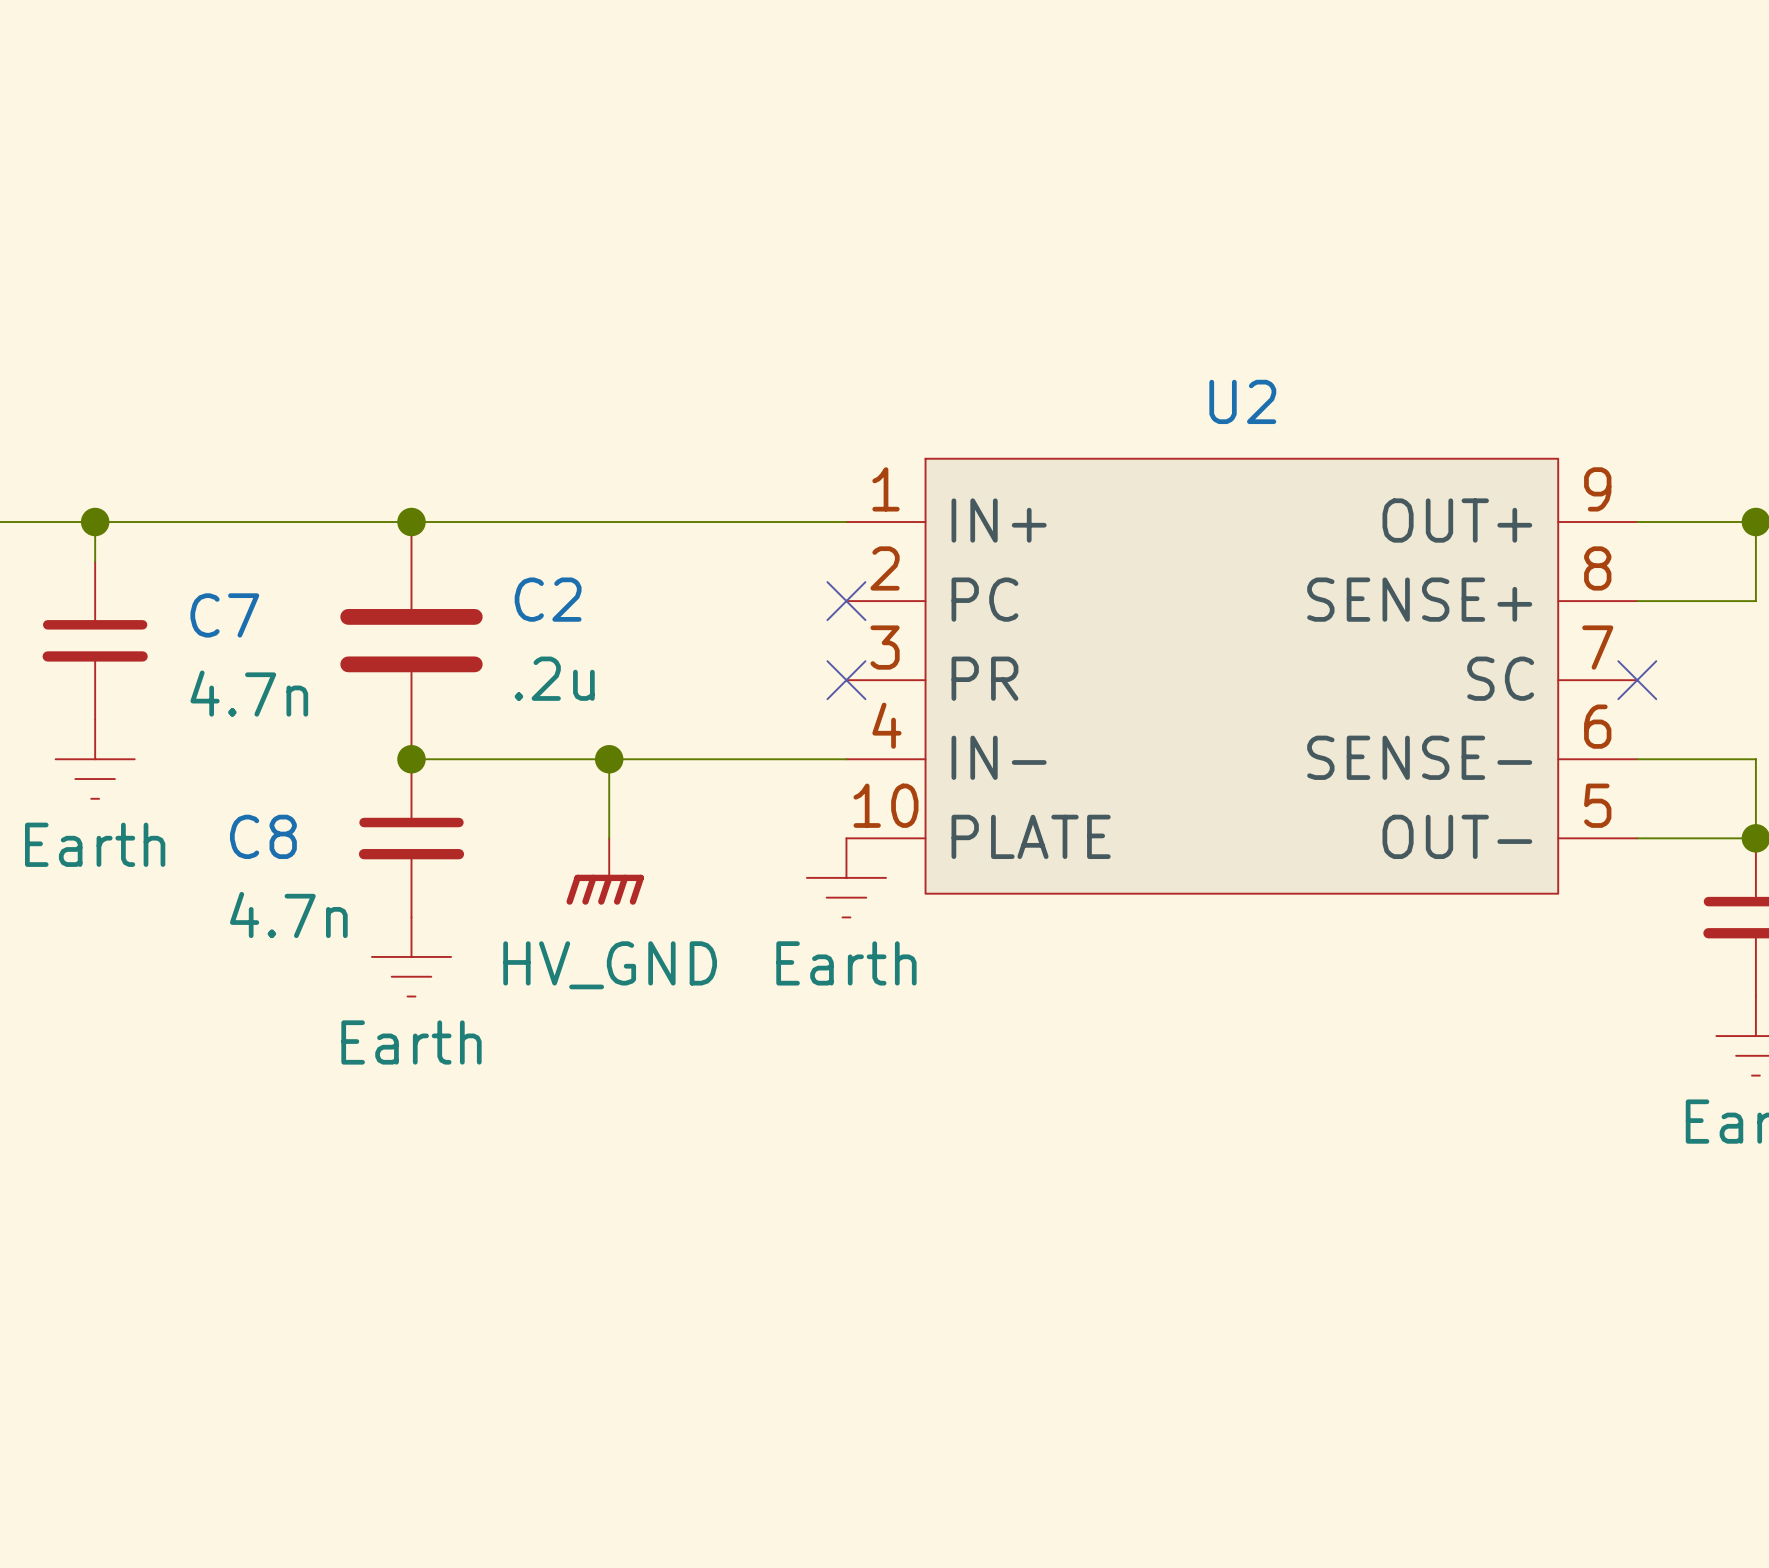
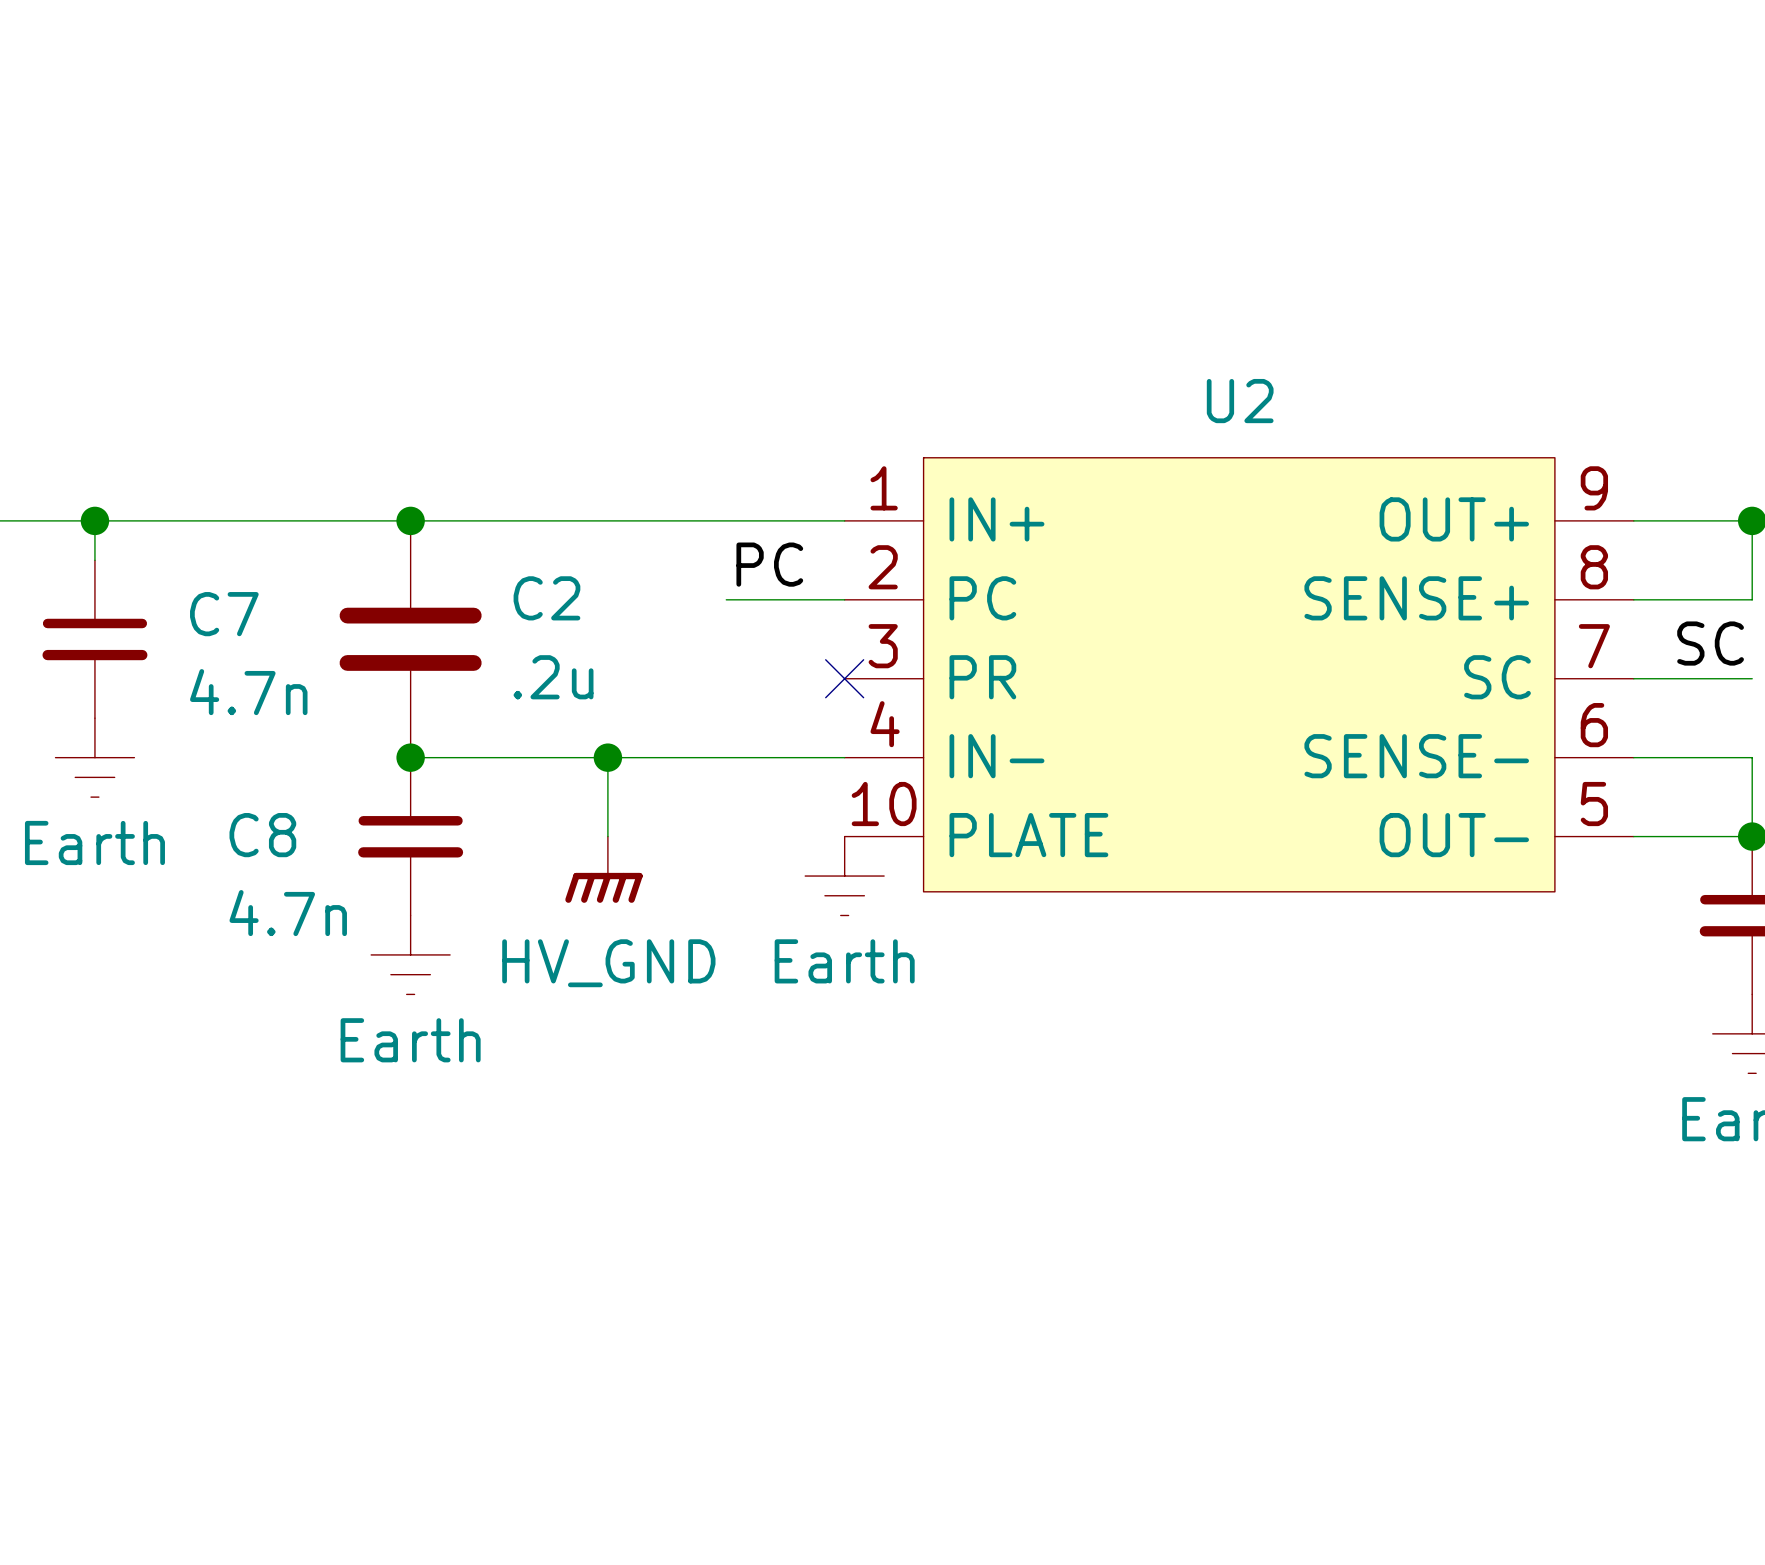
label: none -> PC (769, 564)
wire: none -> (726, 599) (844, 599)
no-connect mark: (846, 601) -> none
label: none -> SC (1710, 643)
wire: none -> (1633, 678) (1752, 678)
no-connect mark: (1637, 680) -> none

